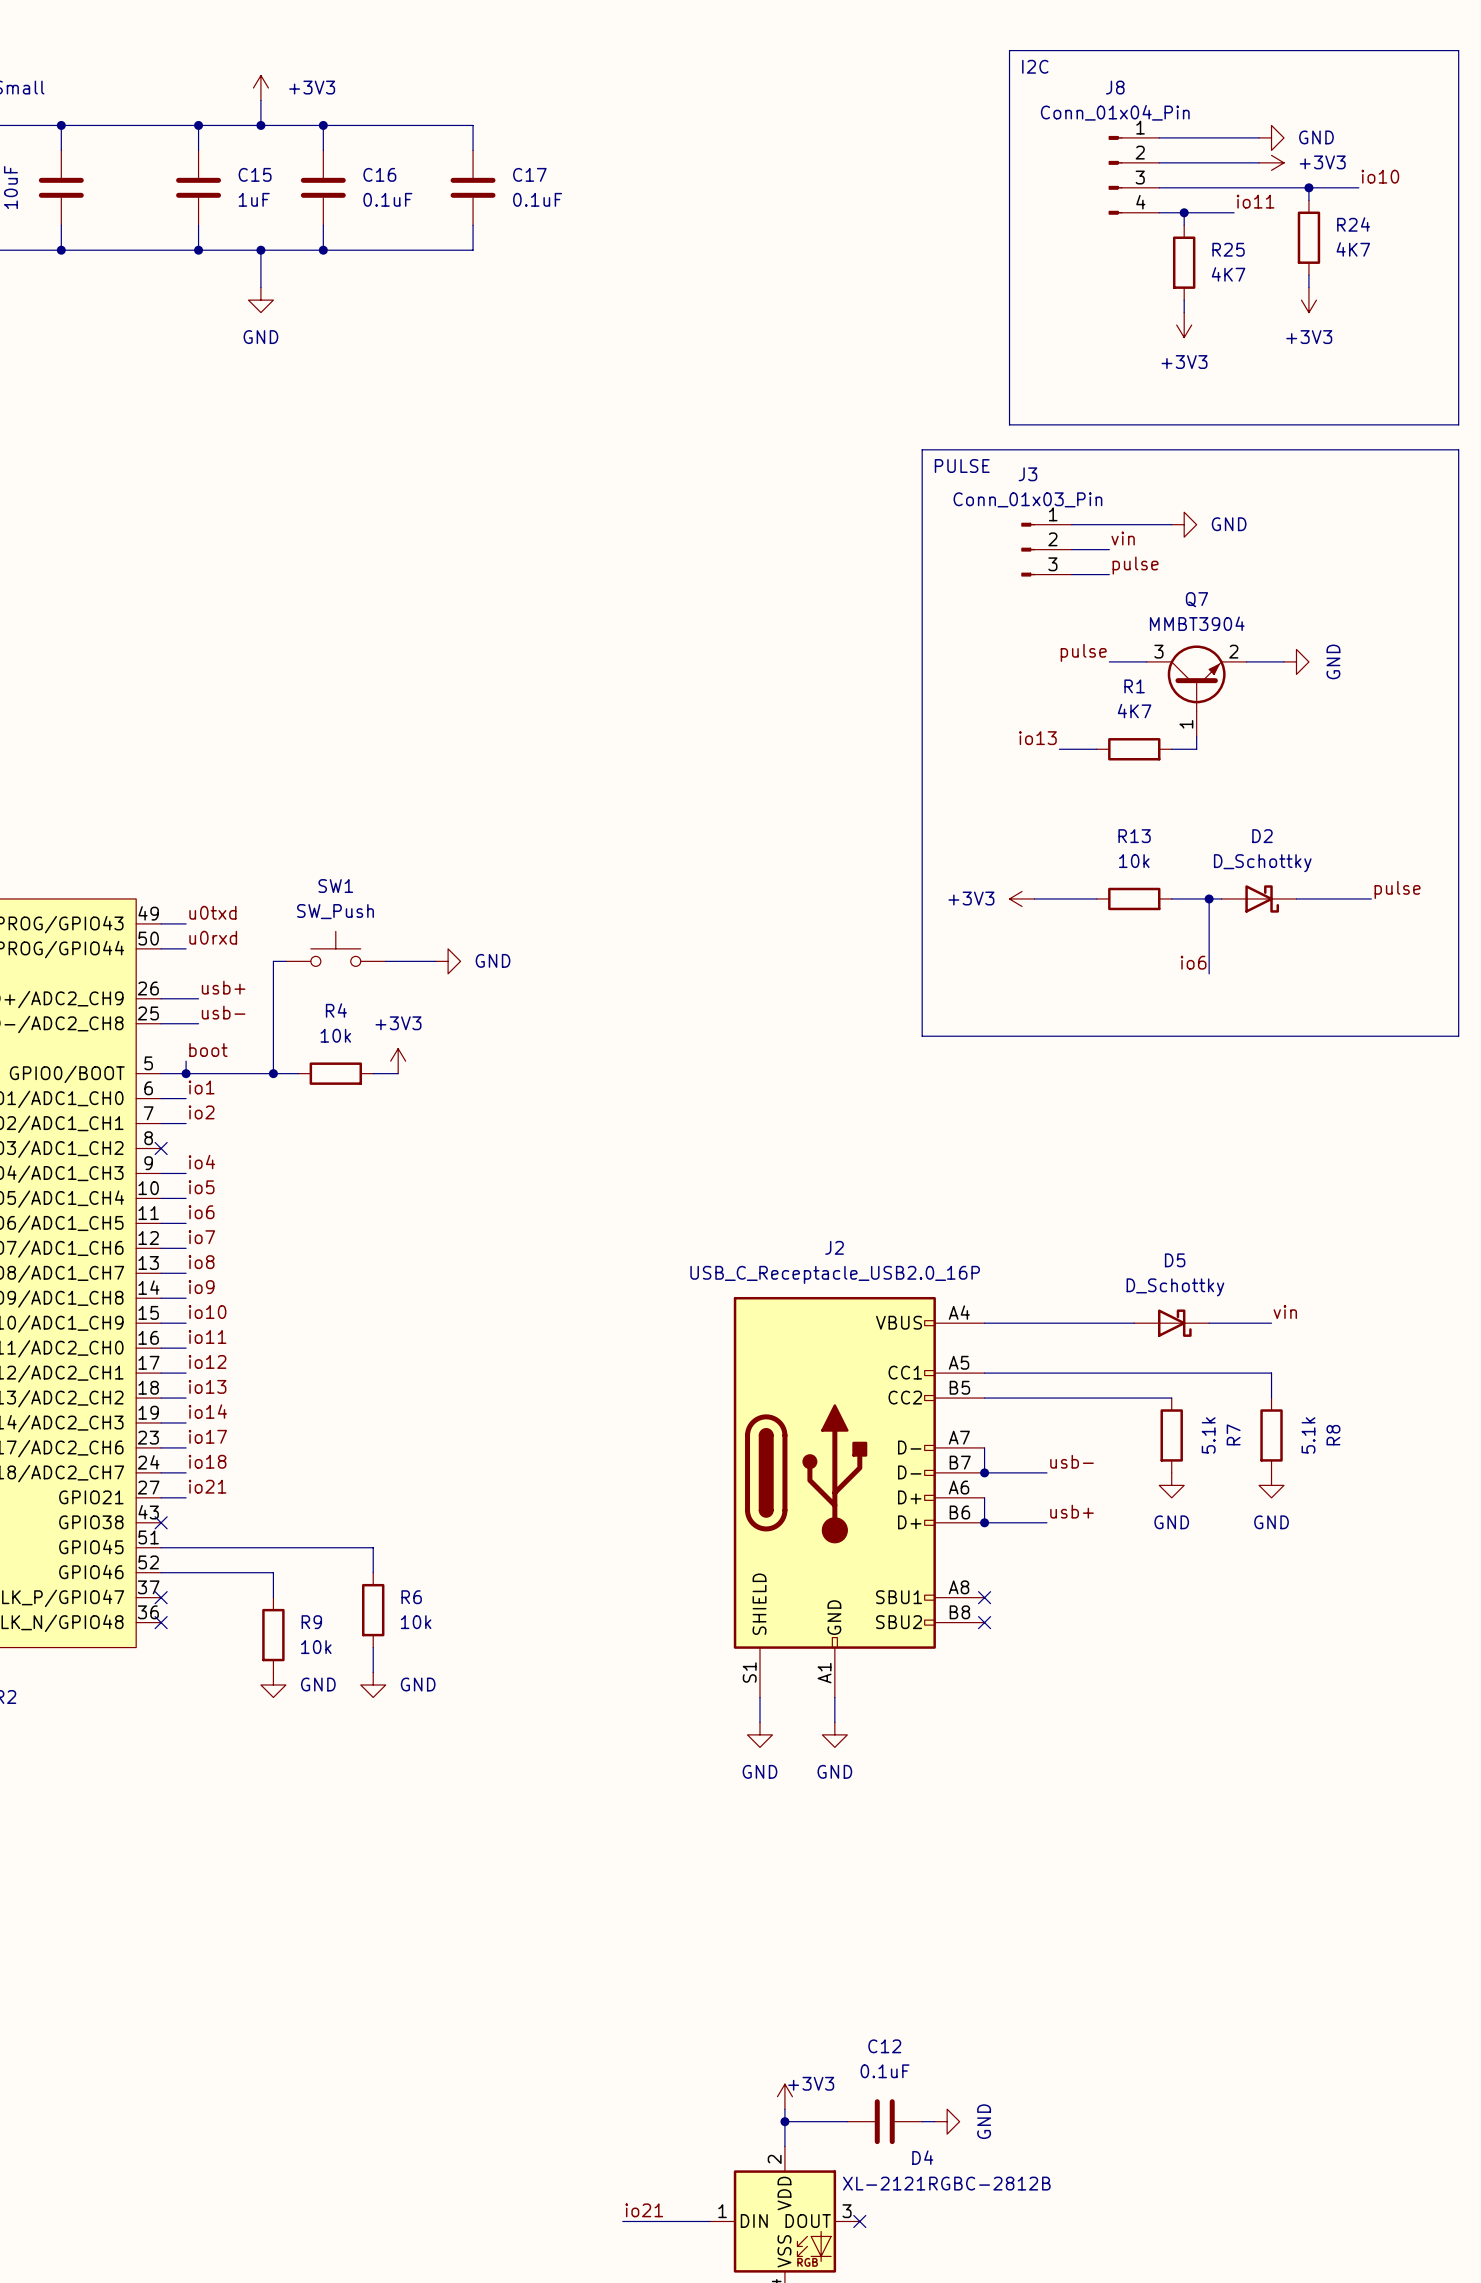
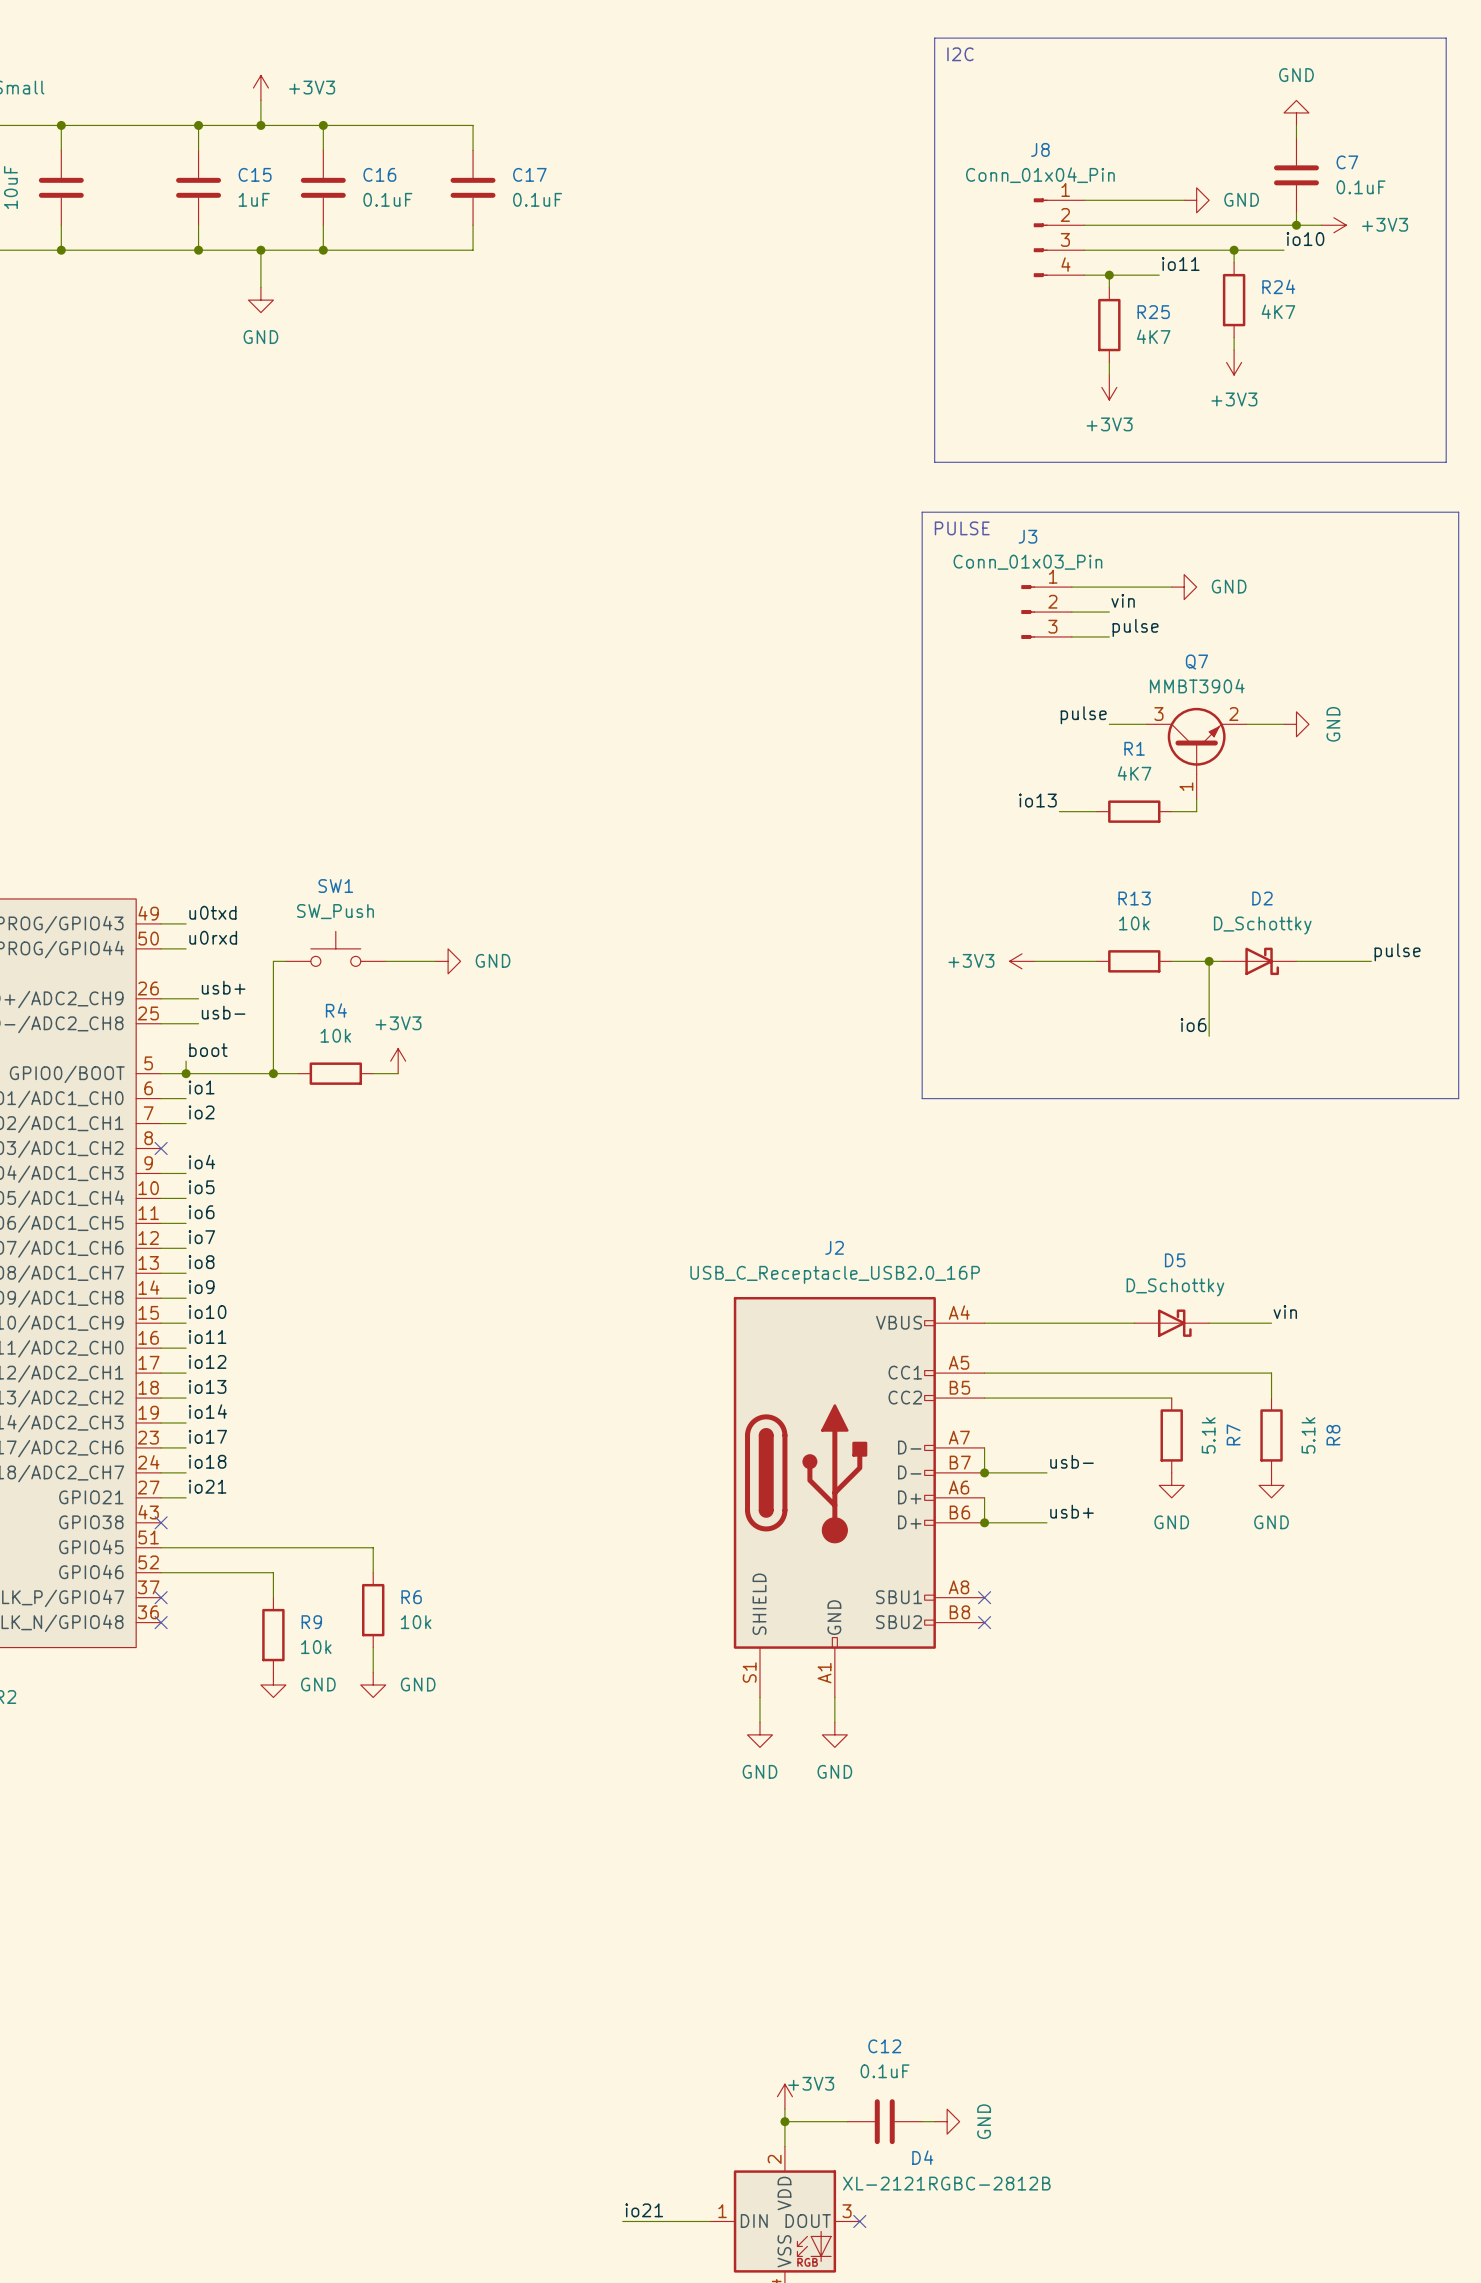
line: (1009, 50) (1458, 50) (1458, 424) (1009, 424) (1009, 50) -> (934, 38) (934, 462) (1446, 462) (1446, 38) (934, 38)
text position: I2C (1035, 66) -> I2C (960, 54)
wire: none -> (1296, 125) (1296, 137)
wire: (1159, 137) (1259, 137) -> (1084, 200) (1184, 200)
power symbol rotation: 0° (1271, 137) -> 90° counterclockwise (1296, 112)
power symbol position: GND (1271, 137) -> GND (1296, 112)
wire: (1159, 162) (1259, 162) -> none
power symbol: +3V3 (1271, 162) -> none
J8 position: (1133, 175) -> (1059, 237)
C7: none -> 0.1uF (1296, 175)
label position: io10 (1380, 176) -> io10 (1305, 239)
wire: (1159, 187) (1358, 187) -> (1084, 250) (1284, 250)
wire: (1308, 187) (1308, 200) -> (1234, 250) (1234, 262)
junction position: (1308, 187) -> (1296, 225)
power symbol: none -> GND (1196, 200)
label position: io11 (1255, 201) -> io11 (1180, 264)
wire: (1159, 212) (1234, 212) -> (1084, 275) (1159, 275)
wire: (1184, 212) (1184, 225) -> (1109, 275) (1109, 287)
junction: (1184, 212) -> none
wire: none -> (1296, 212) (1296, 225)
wire: none -> (1084, 225) (1321, 225)
power symbol: none -> +3V3 (1333, 225)
R24 position: (1308, 237) -> (1234, 300)
junction: none -> (1234, 250)
R25 position: (1184, 262) -> (1109, 325)
junction: none -> (1109, 275)
wire: (1308, 275) (1308, 287) -> (1234, 337) (1234, 350)
wire: (1184, 300) (1184, 312) -> (1109, 362) (1109, 374)
power symbol: +3V3 (1308, 300) -> none
power symbol: +3V3 (1184, 325) -> none
power symbol: none -> +3V3 (1234, 362)
power symbol: none -> +3V3 (1109, 387)
text position: PULSE (962, 466) -> PULSE (962, 528)
line: (922, 512) (922, 449) (1458, 449) (1458, 512) -> (922, 512) (1458, 512)
wire: (1071, 524) (1171, 524) -> (1071, 587) (1171, 587)
power symbol position: GND (1184, 524) -> GND (1184, 587)
label position: vin (1123, 538) -> vin (1123, 600)
J3 position: (1046, 549) -> (1046, 612)
wire: (1071, 549) (1109, 549) -> (1071, 612) (1109, 612)
label: pulse (1135, 565) -> none
wire: (1071, 574) (1109, 574) -> (1071, 636) (1109, 636)
label position: pulse (1083, 652) -> pulse (1135, 627)
wire: (1109, 661) (1146, 661) -> (1109, 724) (1146, 724)
wire: (1246, 661) (1284, 661) -> (1246, 724) (1284, 724)
power symbol position: GND (1296, 661) -> GND (1296, 724)
Q7 position: (1196, 691) -> (1196, 753)
label: none -> pulse (1083, 715)
wire: (1196, 736) (1196, 749) (1171, 749) -> (1196, 799) (1196, 811) (1171, 811)
label position: io13 (1037, 738) -> io13 (1037, 800)
wire: (1059, 749) (1096, 749) -> (1059, 811) (1096, 811)
R1 position: (1134, 749) -> (1134, 811)
label position: pulse (1397, 889) -> pulse (1397, 952)
power symbol position: +3V3 (1021, 898) -> +3V3 (1021, 961)
wire: (1034, 898) (1096, 898) -> (1034, 961) (1096, 961)
R13 position: (1134, 898) -> (1134, 961)
wire: (1171, 898) (1221, 898) -> (1171, 961) (1221, 961)
wire: (1209, 898) (1209, 961) -> (1209, 973) (1209, 1036)
junction: (1209, 898) -> none
D2 position: (1259, 898) -> (1259, 961)
wire: (1296, 898) (1371, 898) -> (1296, 961) (1371, 961)
junction: none -> (1209, 961)
label position: io6 (1193, 962) -> io6 (1193, 1025)
line: (922, 1036) (1458, 1036) -> (922, 1036) (922, 1098) (1458, 1098) (1458, 1036)

